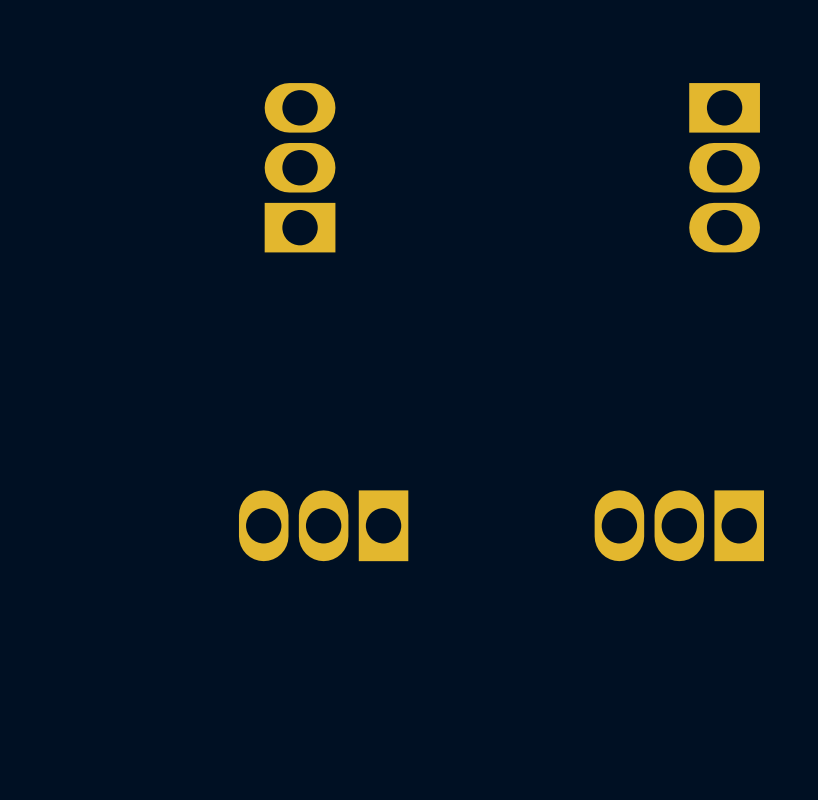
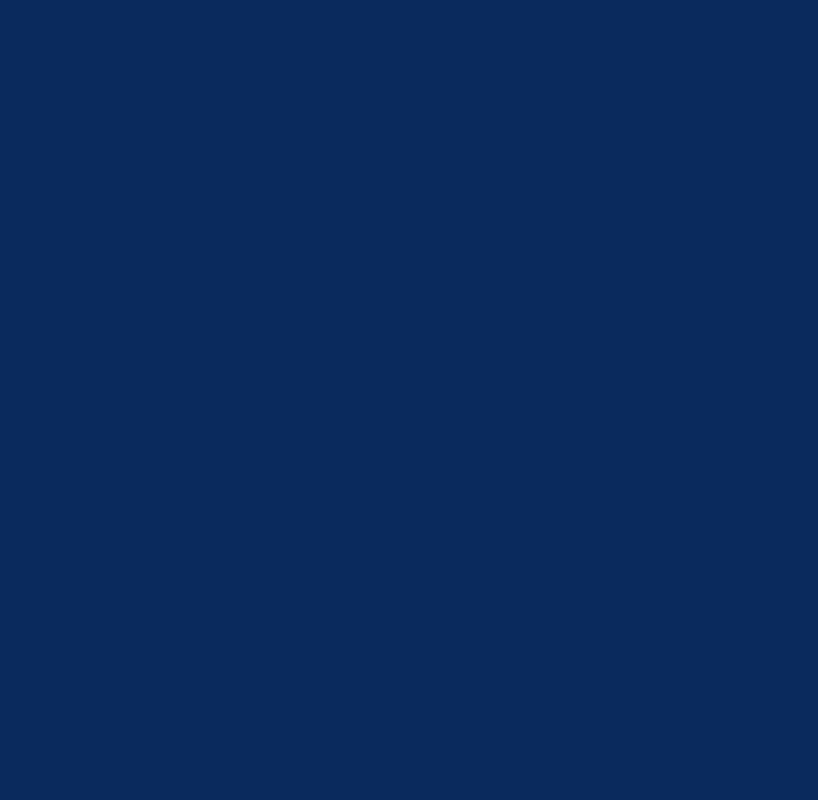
part: (300, 167) -> none
part: (724, 167) -> none
part: (323, 525) -> none
part: (679, 525) -> none

